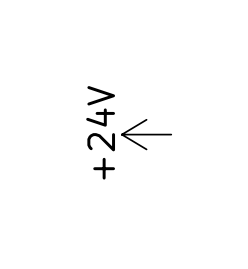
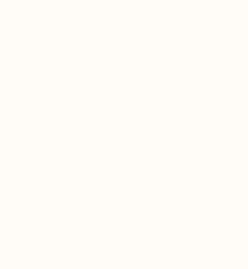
power symbol: +24V (146, 134) -> none

